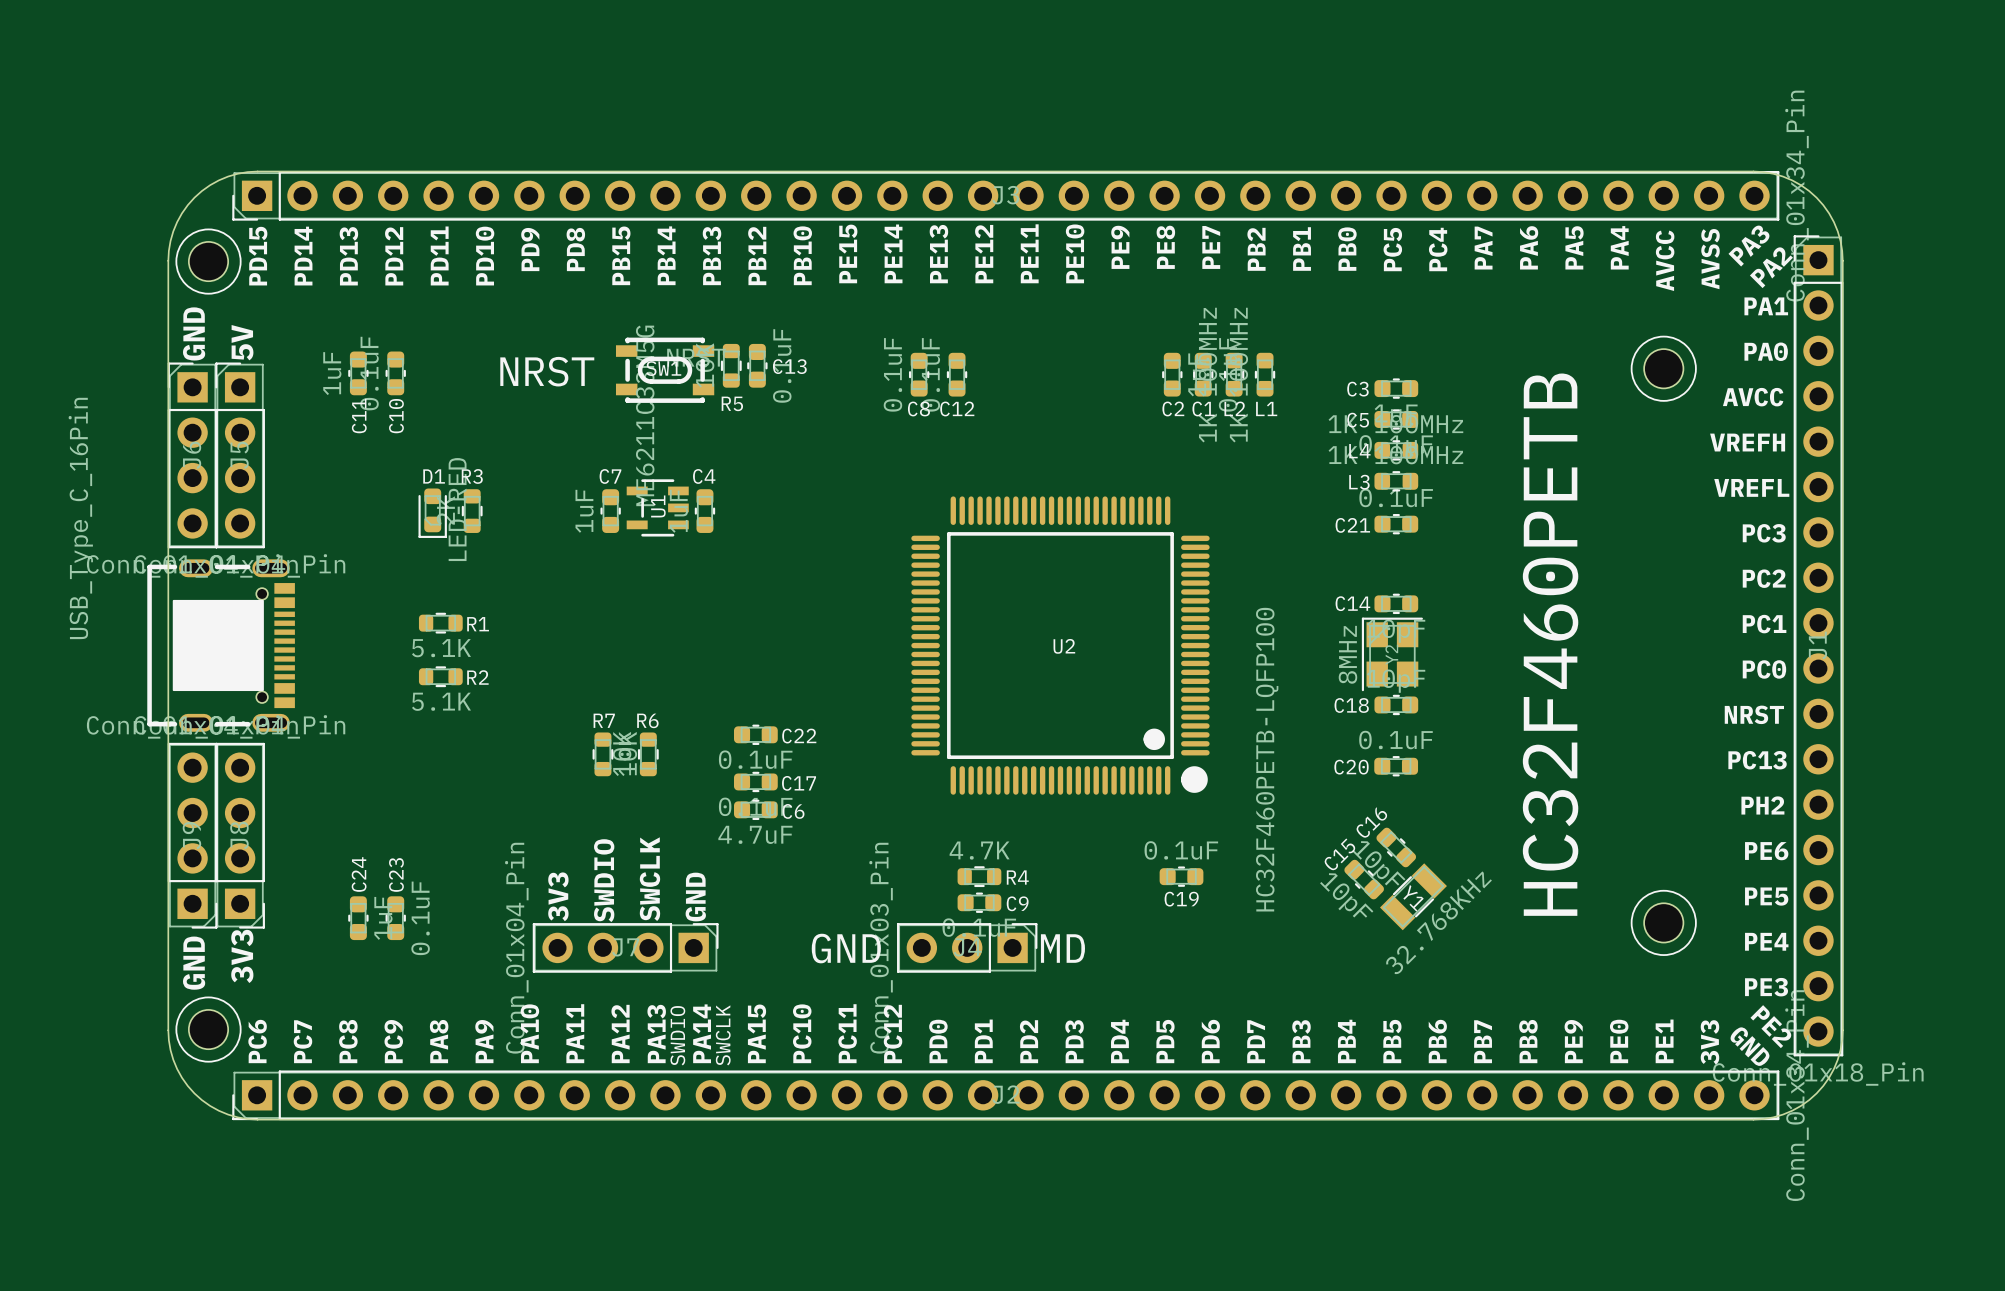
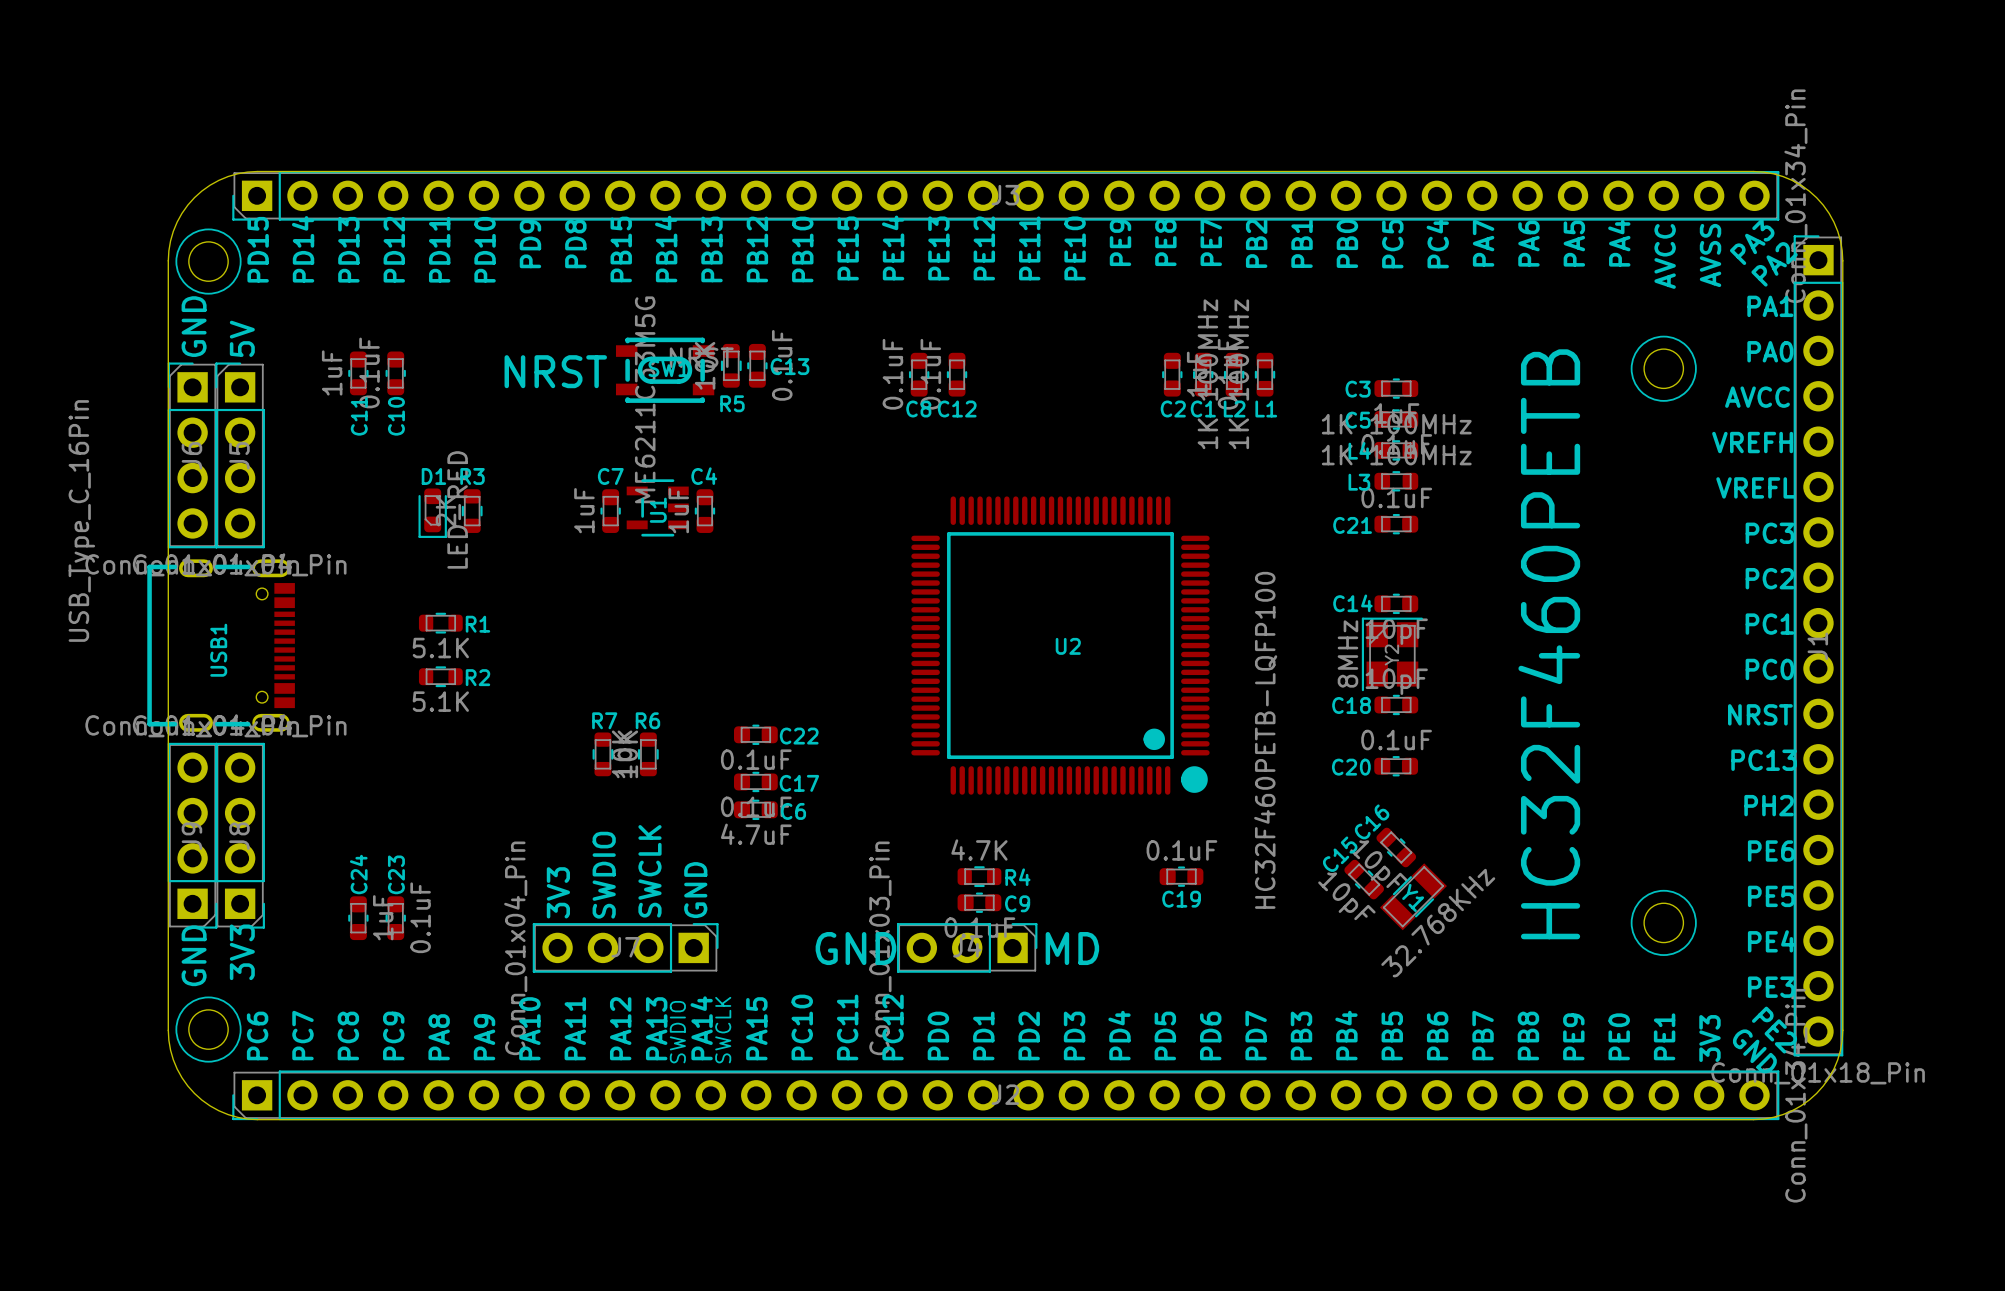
drawing: [172, 599, 264, 692] -> none

